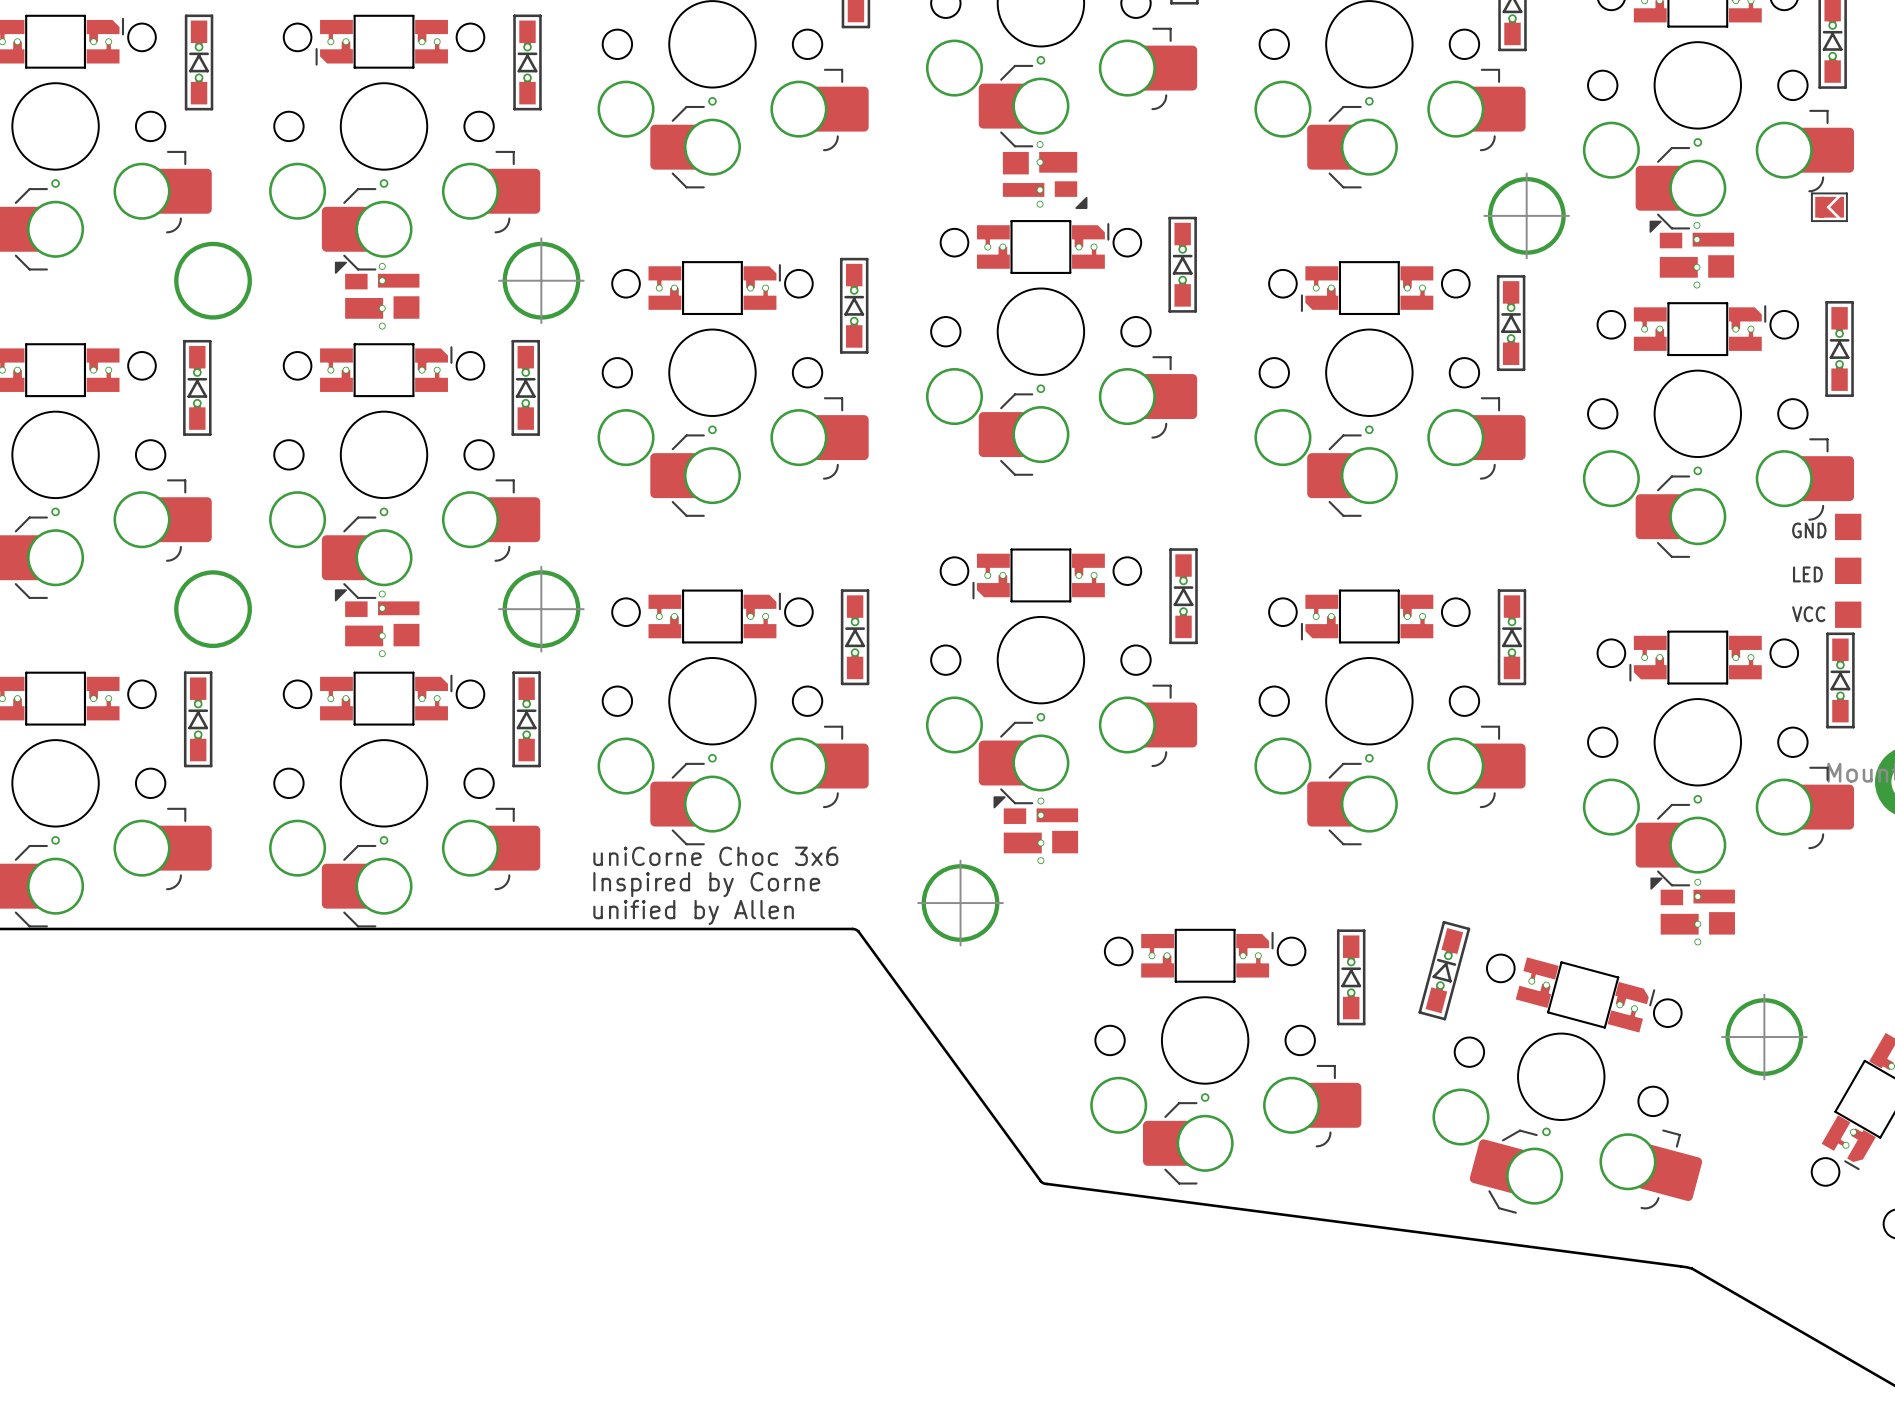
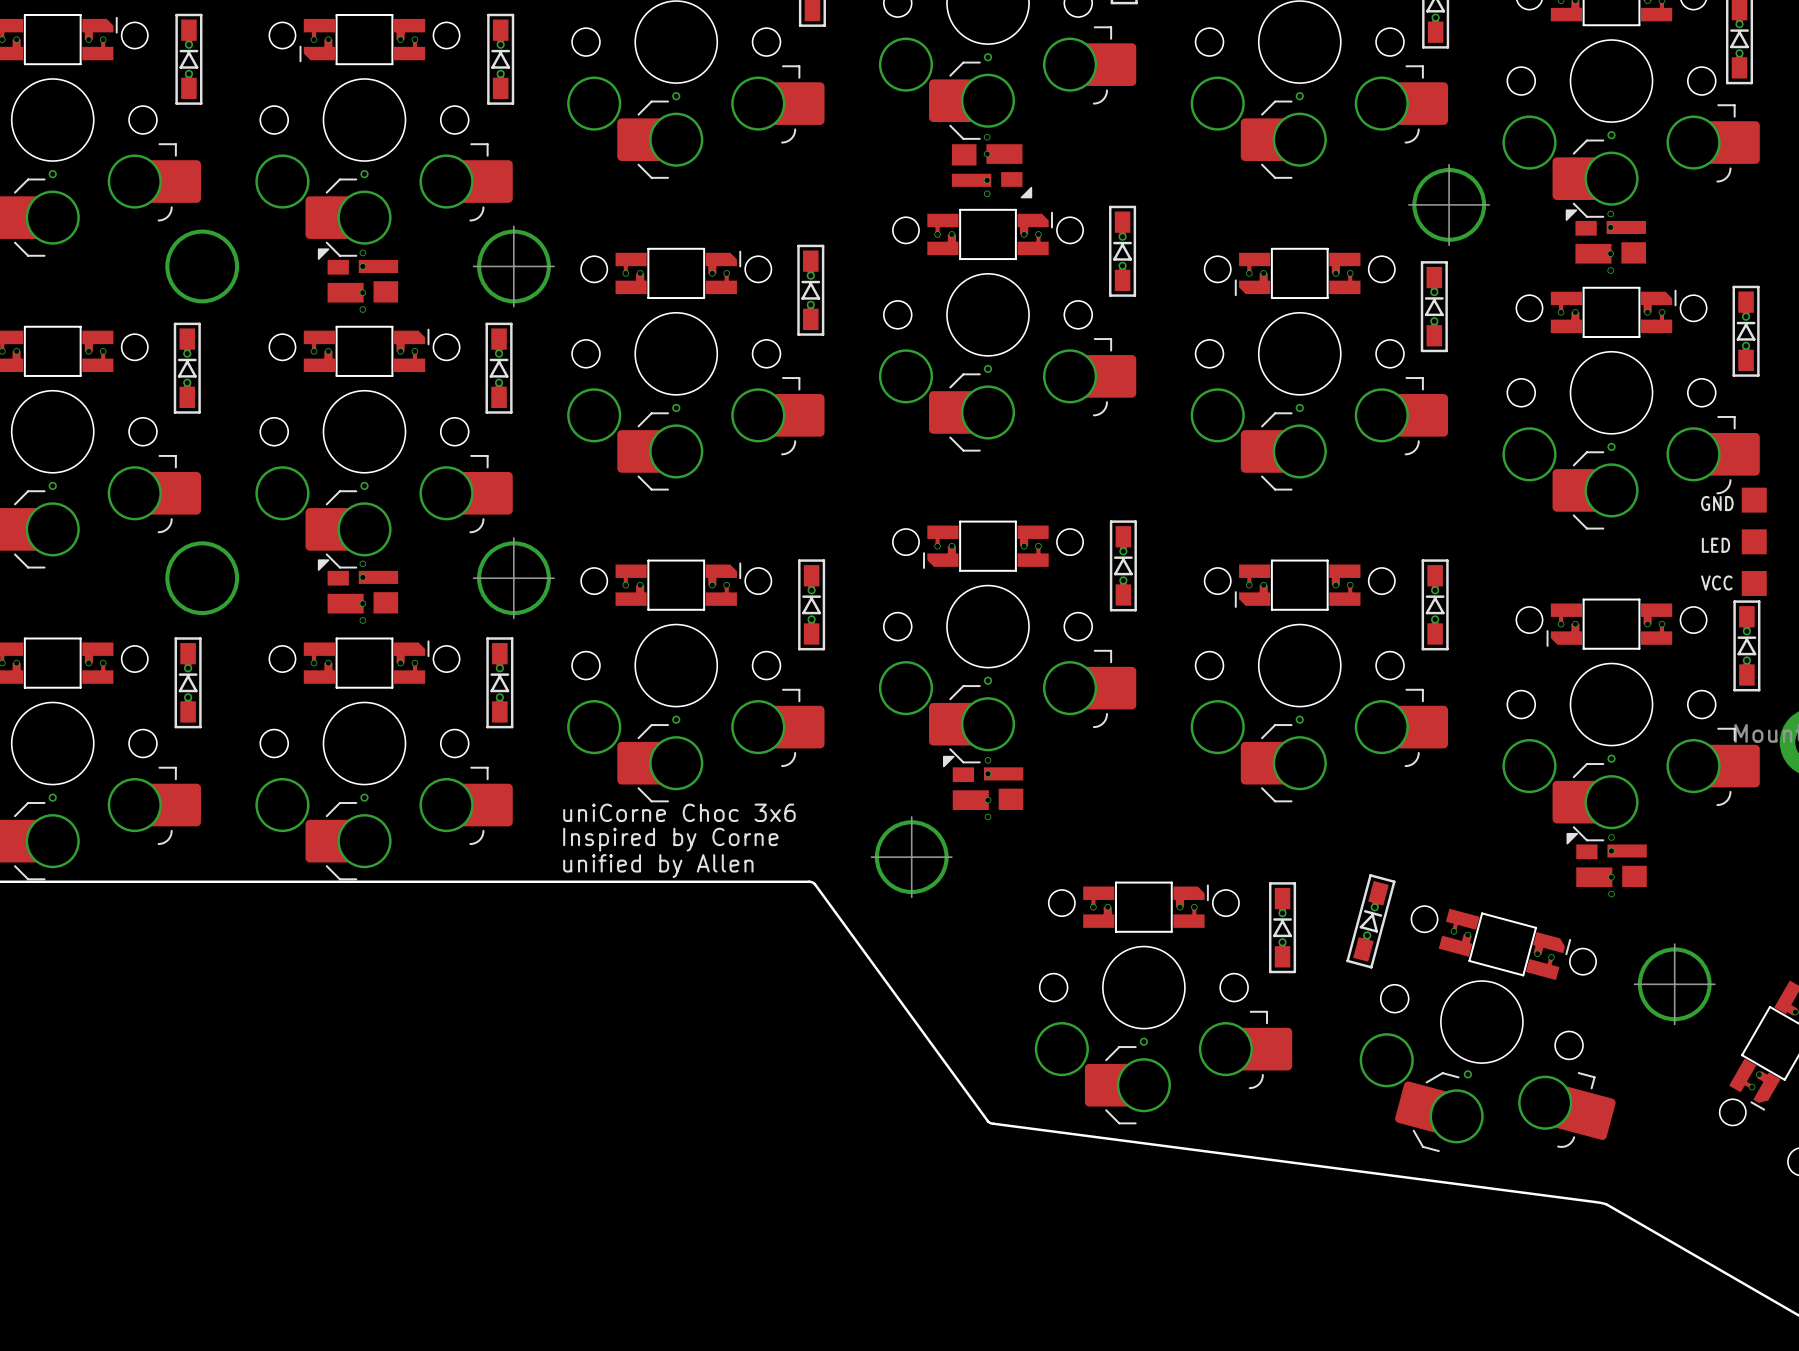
line: (1811, 193) (1846, 193) (1846, 221) (1811, 221) (1811, 193) -> none
part: (1829, 207) -> none

